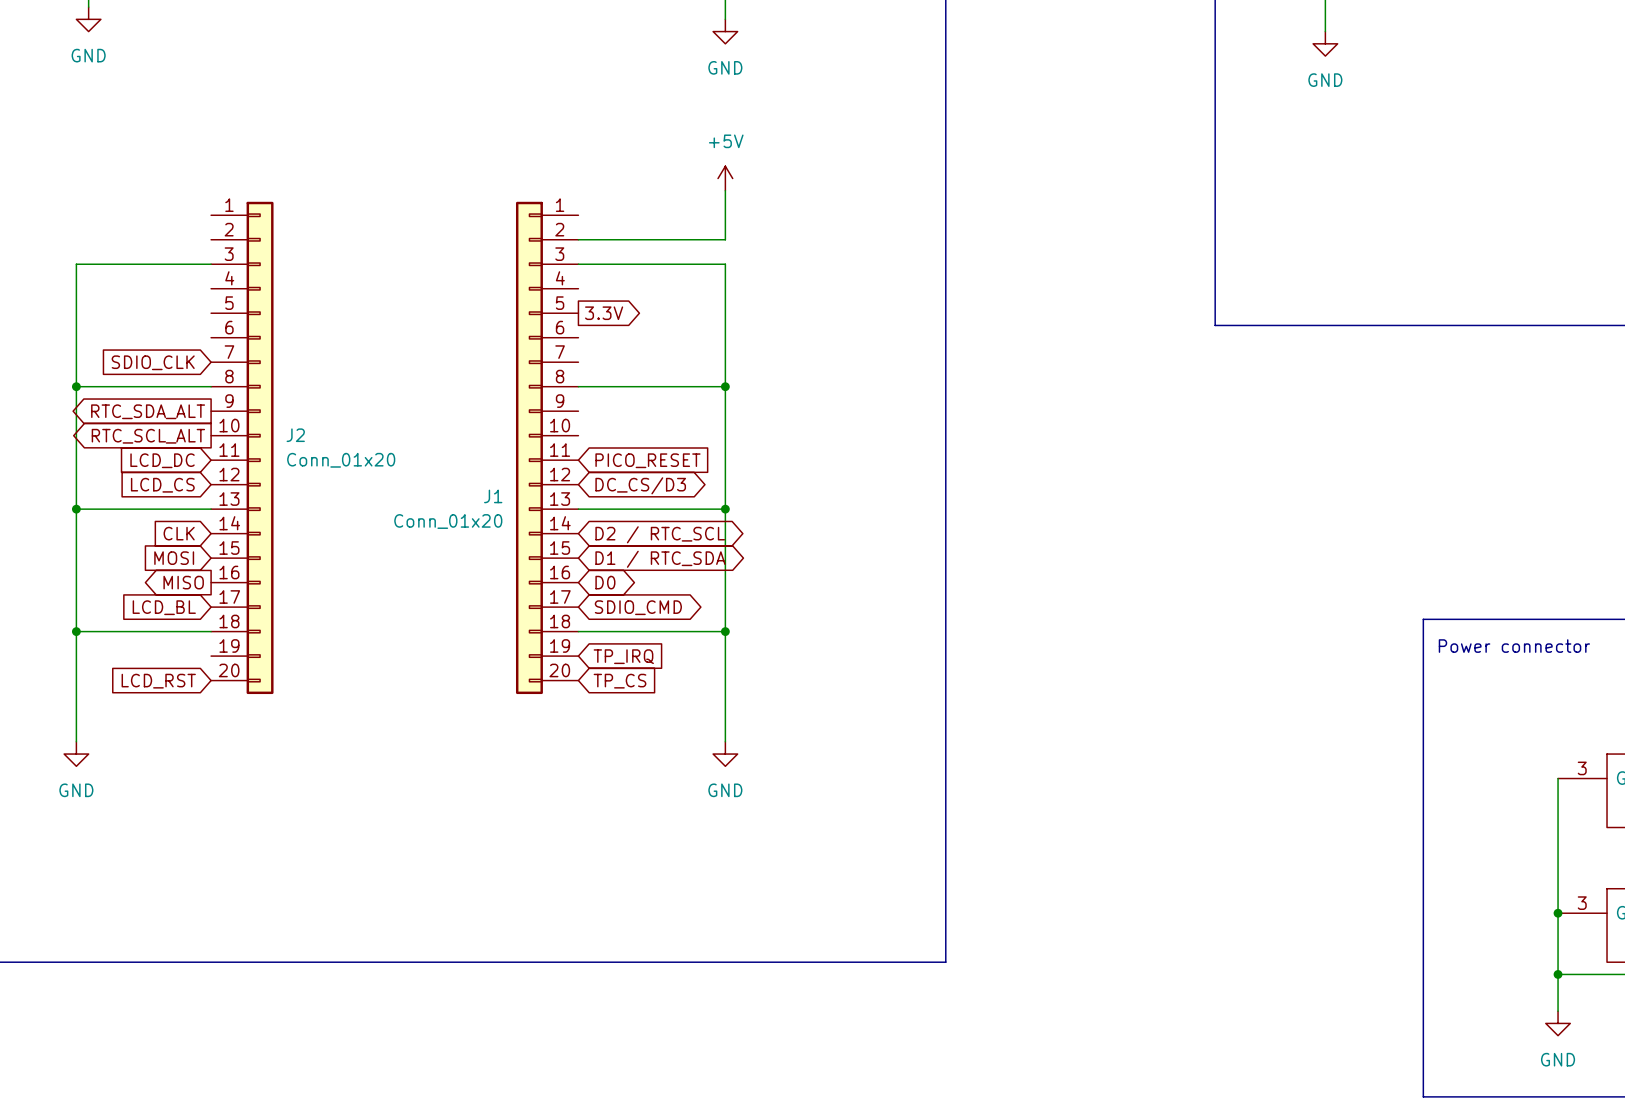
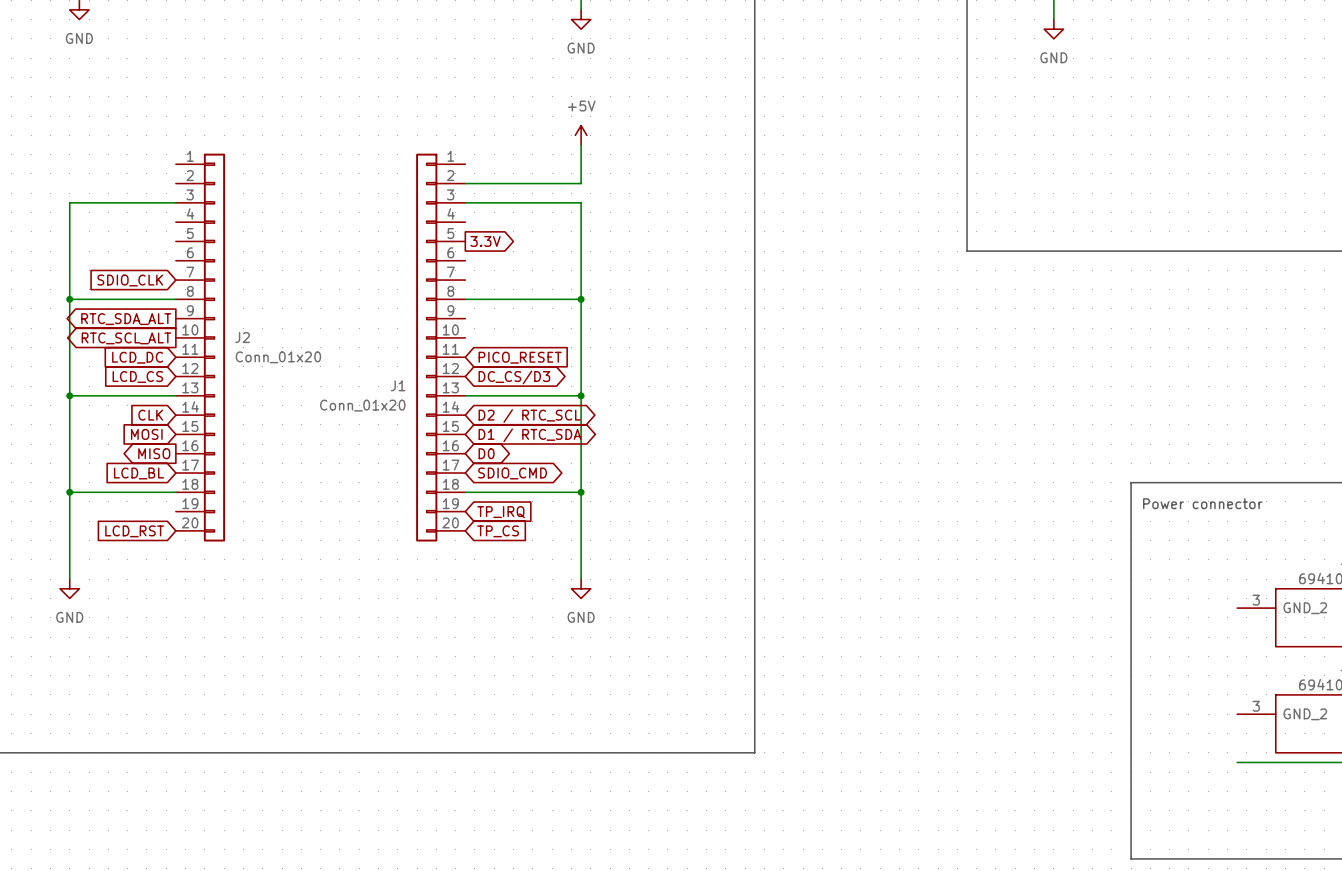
wire: (1558, 778) (1558, 1011) -> none
junction: (1558, 913) -> none
junction: (1558, 974) -> none
power symbol: GND (1558, 1023) -> none

